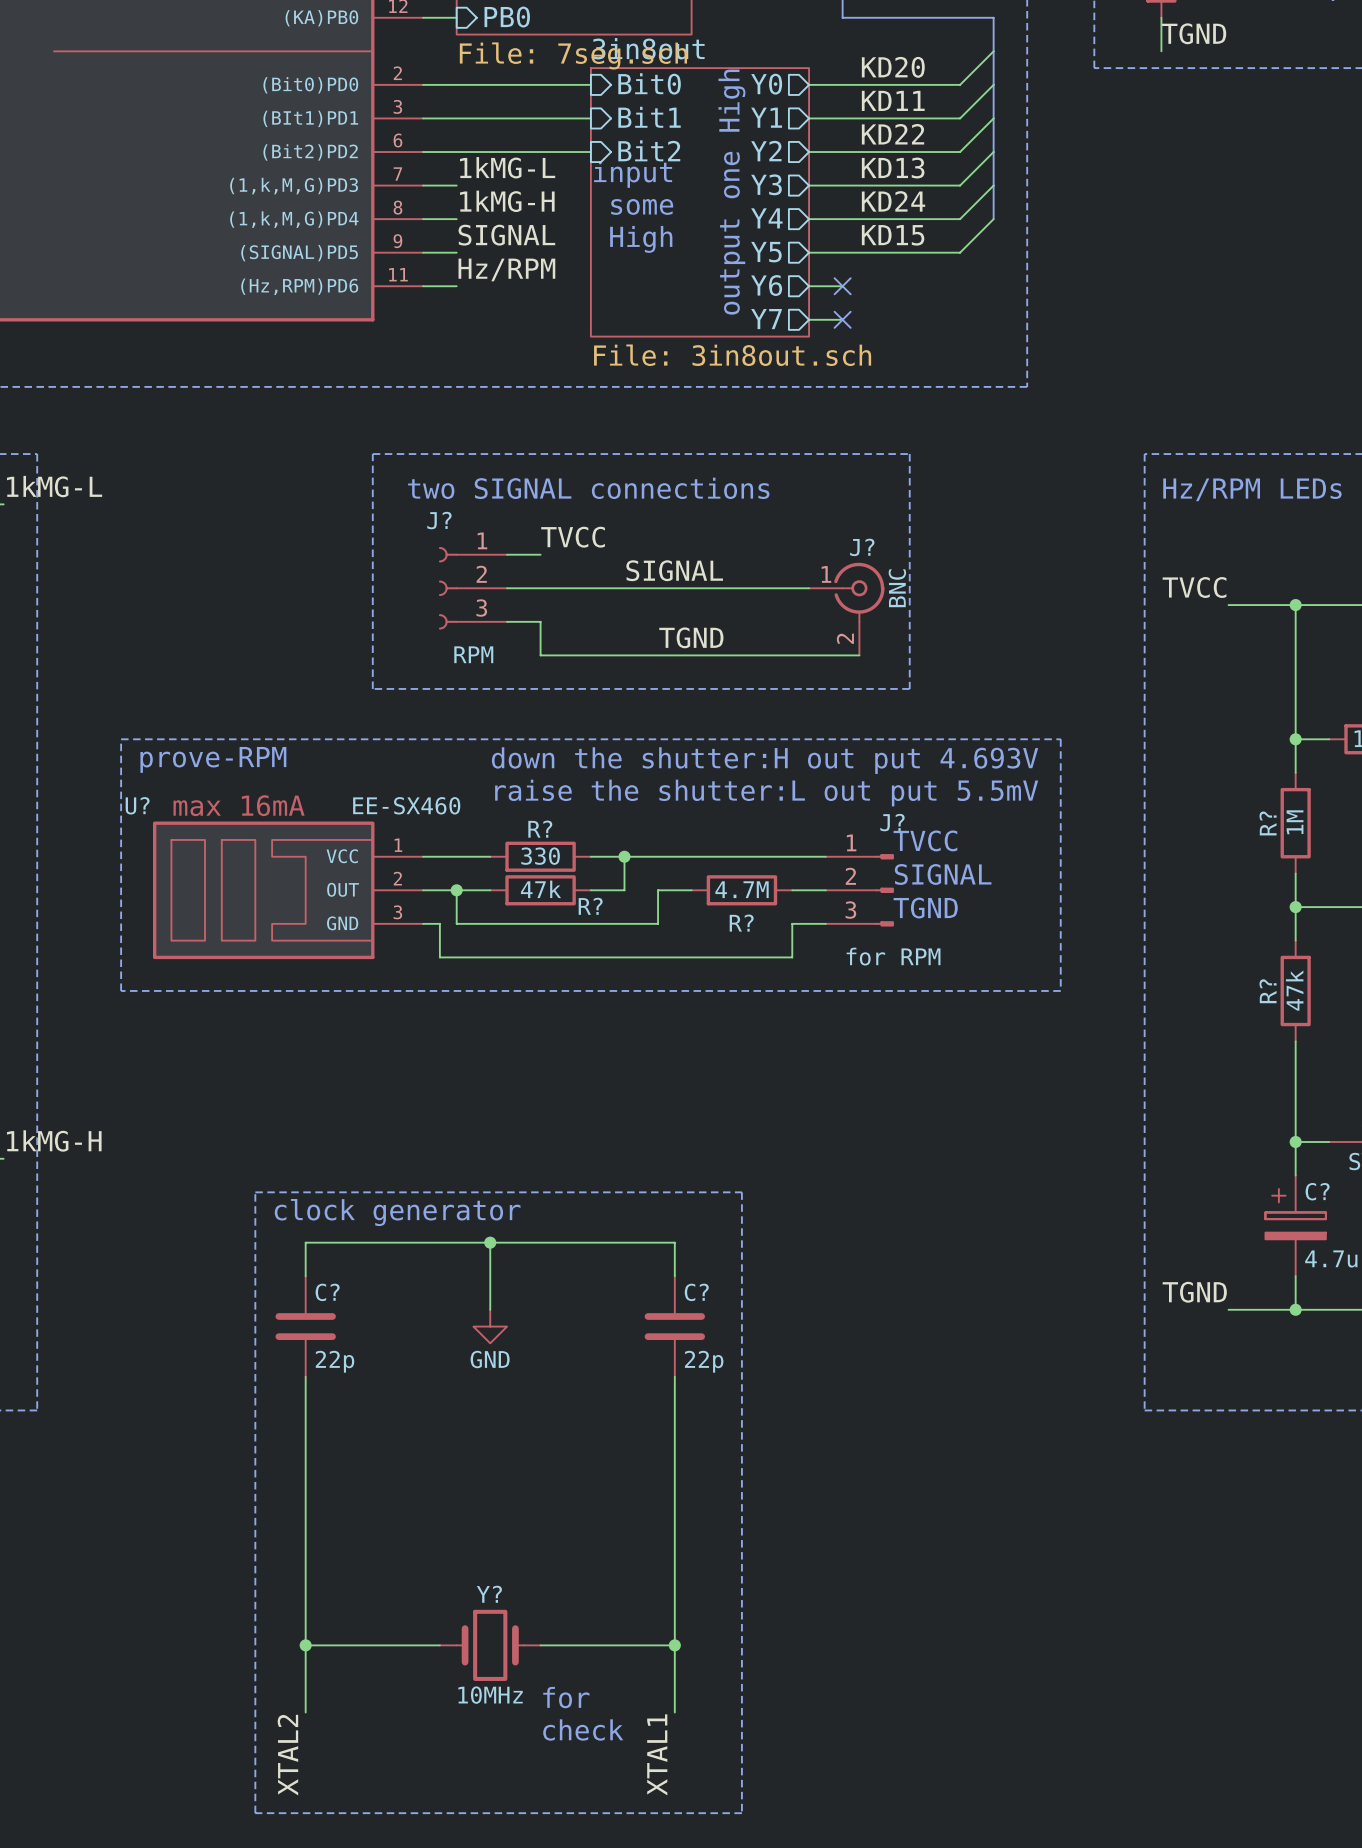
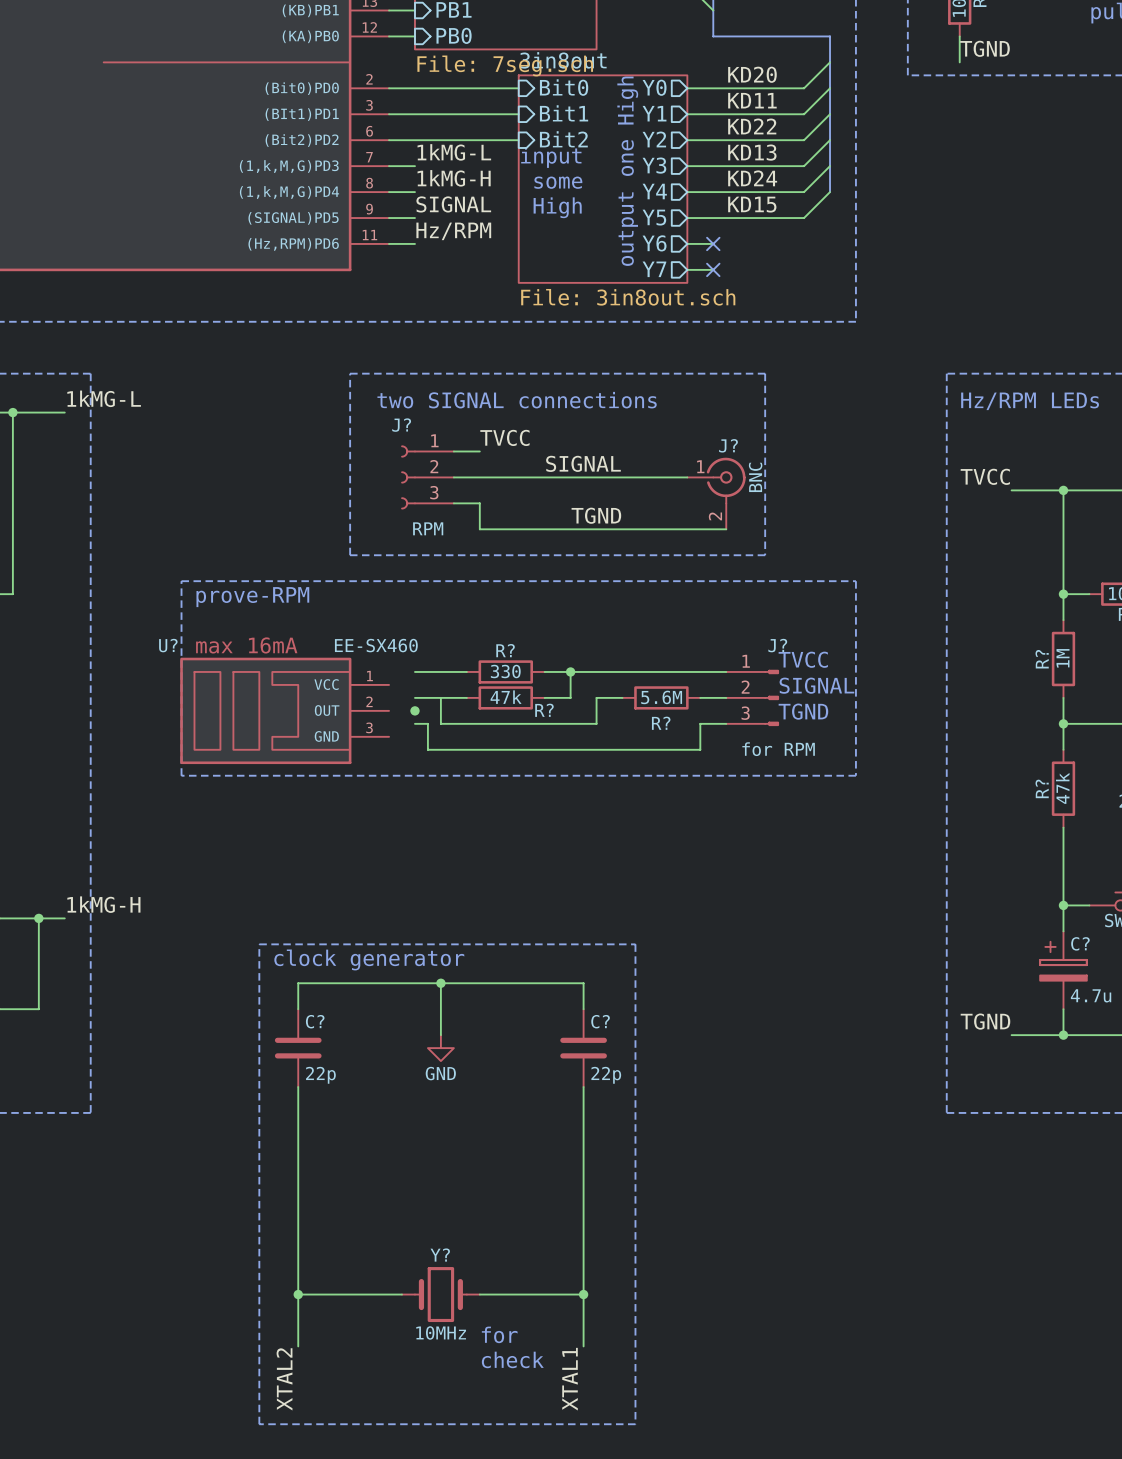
line: (121, 739) (1060, 739) (1060, 990) (121, 990) (121, 739) -> (181, 581) (181, 775) (855, 775) (855, 581) (181, 581)
text position: prove-RPM (213, 759) -> prove-RPM (252, 597)
text: down the shutter:H out put 4.693V (765, 760) -> none
text: raise the shutter:L out put 5.5mV (766, 793) -> none
text position: TVCC (925, 840) -> TVCC (803, 659)
wire: (423, 856) (490, 856) -> (414, 671) (466, 671)
R? position: (540, 856) -> (505, 671)
wire: (590, 856) (825, 856) -> (544, 671) (726, 671)
wire: (624, 856) (624, 890) (590, 890) -> (570, 671) (570, 697) (544, 697)
junction position: (624, 856) -> (570, 671)
R?: none -> 5.6M (661, 697)
text position: SIGNAL (943, 874) -> SIGNAL (816, 685)
wire: (423, 890) (490, 890) -> (414, 697) (466, 697)
wire: (456, 890) (456, 923) (658, 923) (658, 890) (691, 890) -> (440, 697) (440, 723) (596, 723) (596, 697) (622, 697)
R? position: (540, 890) -> (505, 697)
R?: 4.7M (741, 890) -> none
wire: (792, 890) (825, 890) -> (700, 697) (726, 697)
J? position: (859, 890) -> (752, 697)
text position: TGND (925, 908) -> TGND (803, 711)
wire: (423, 923) (439, 923) (439, 957) (792, 957) (792, 923) (825, 923) -> (414, 723) (427, 723) (427, 749) (700, 749) (700, 723) (726, 723)

